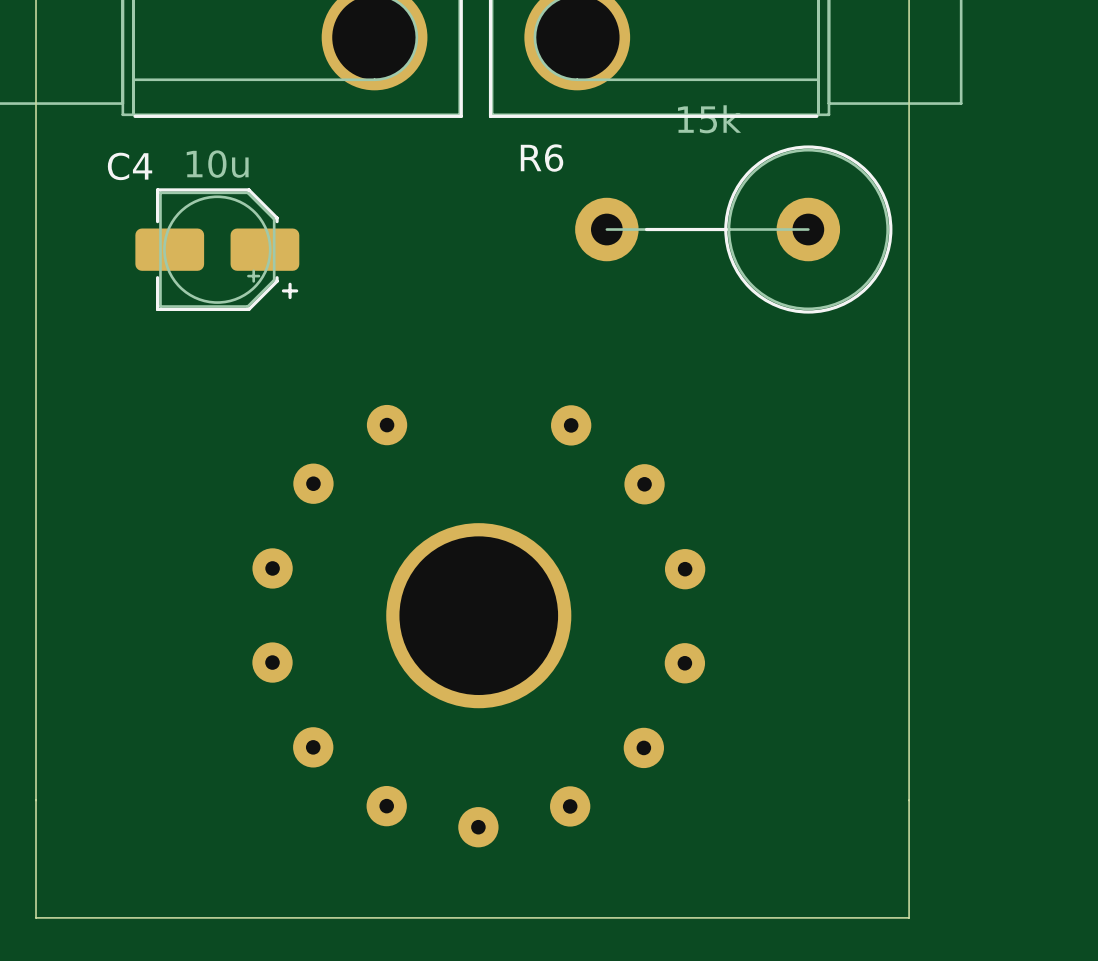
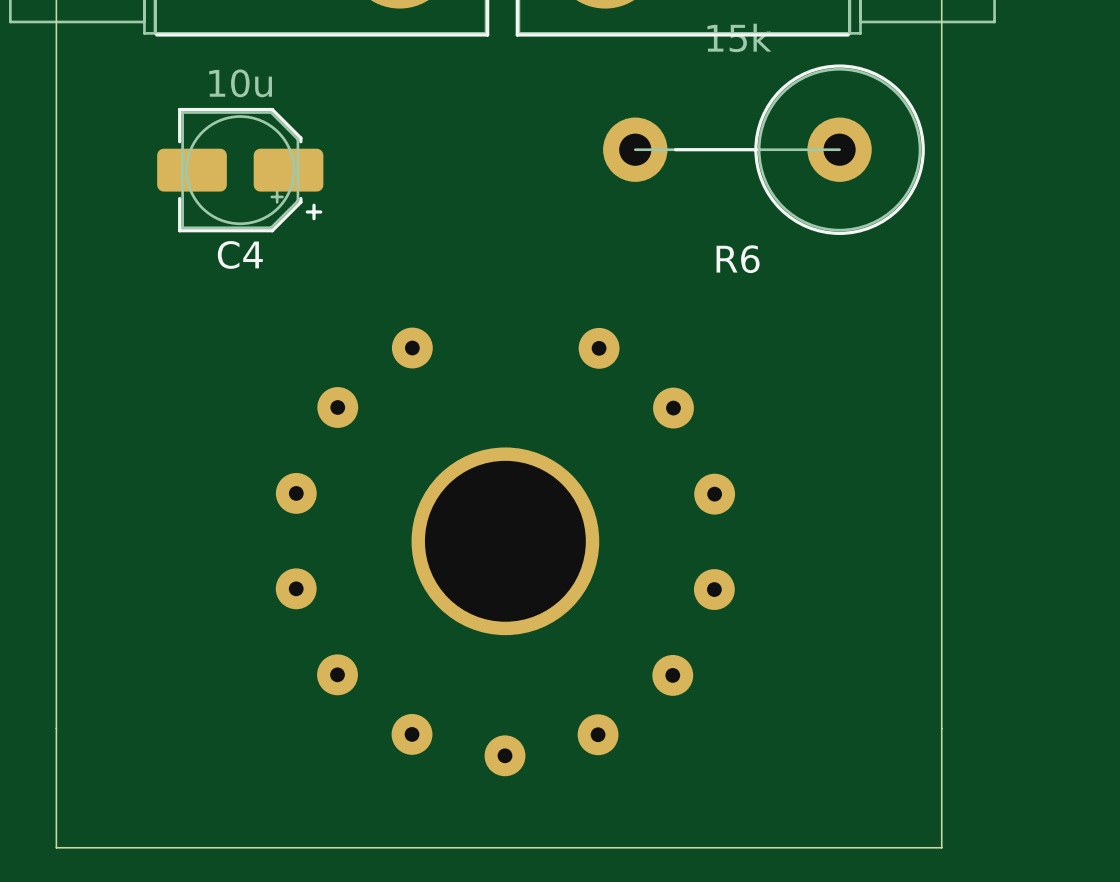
R6 name position: R6 (542, 158) -> R6 (738, 259)
C4 name position: C4 (130, 166) -> C4 (240, 254)

